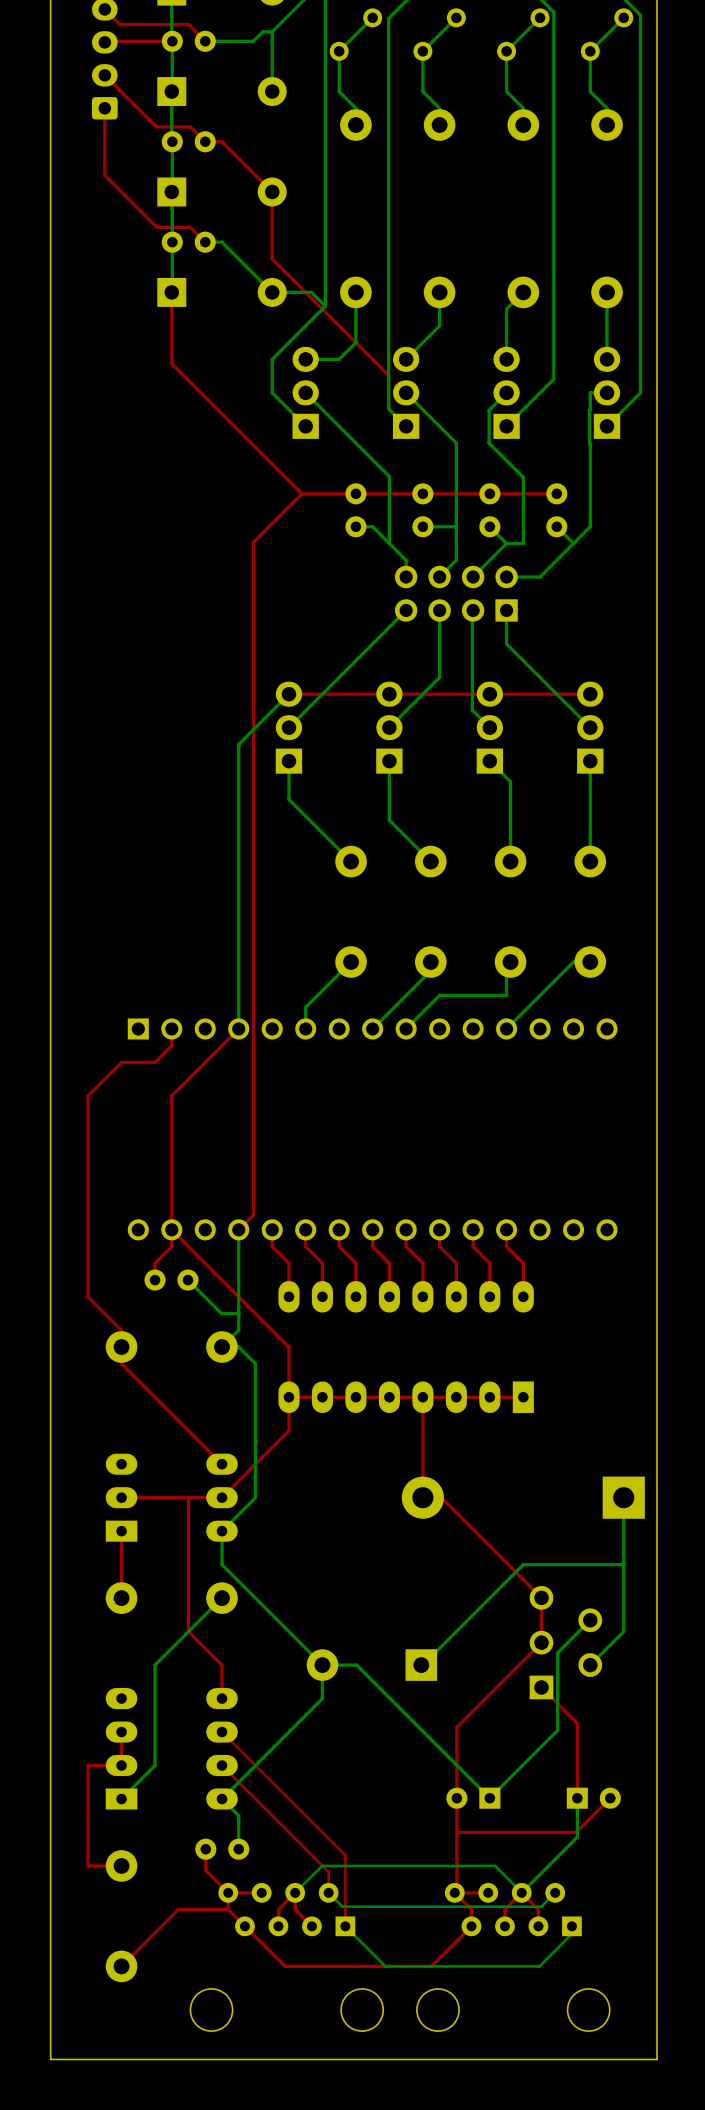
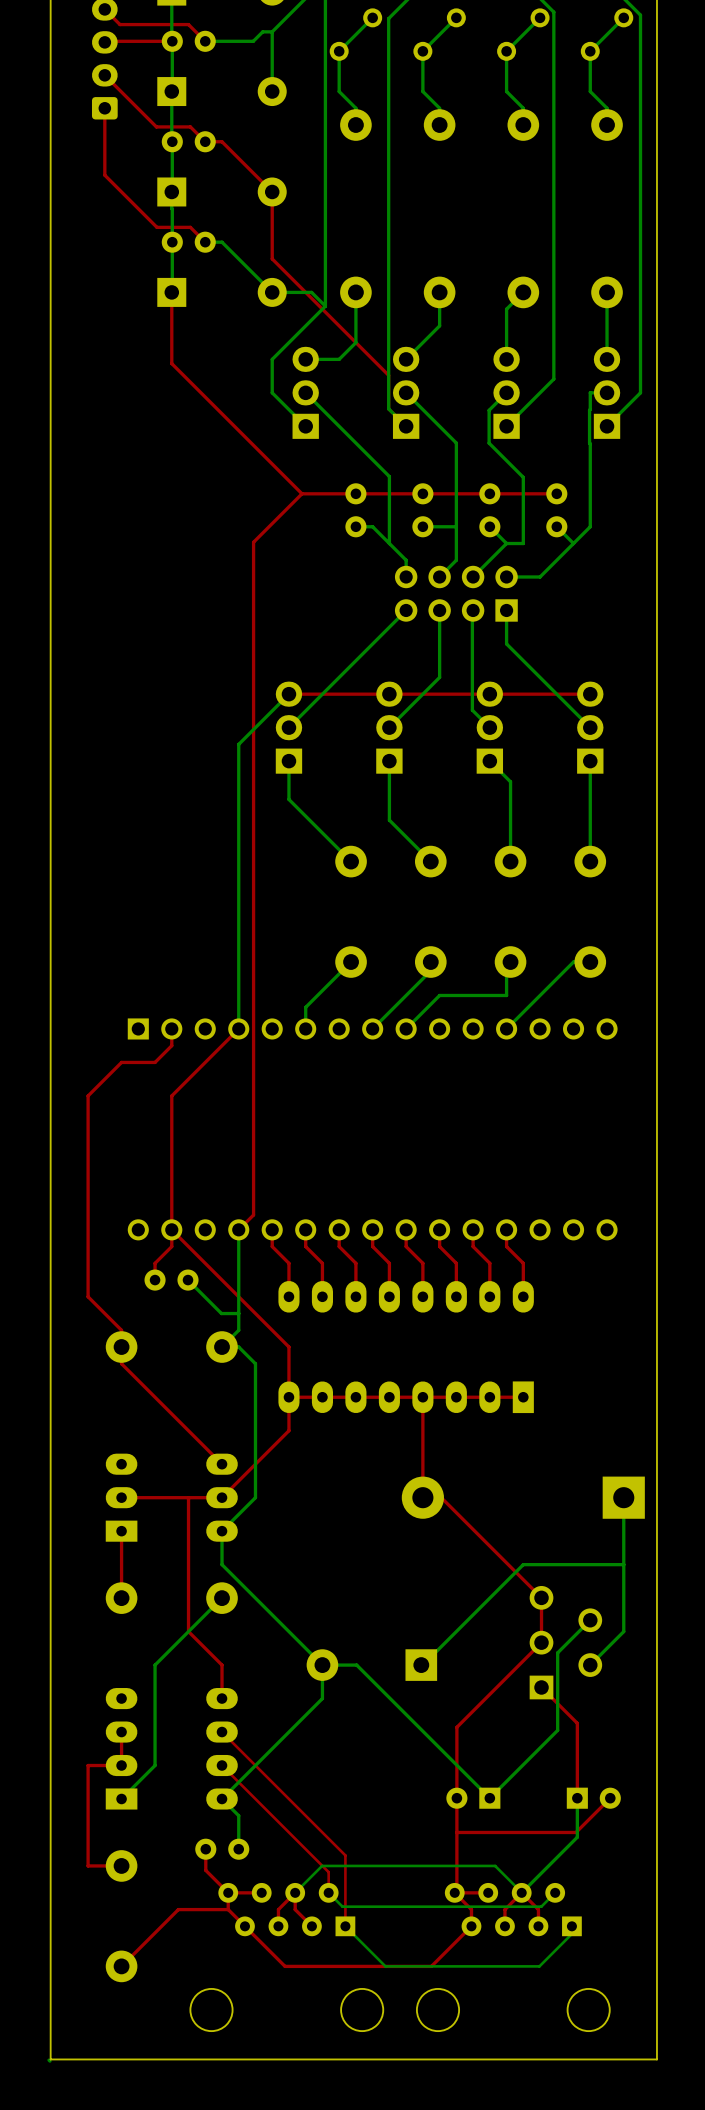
bottom track: none -> (49, 2060) (49, 2061)

